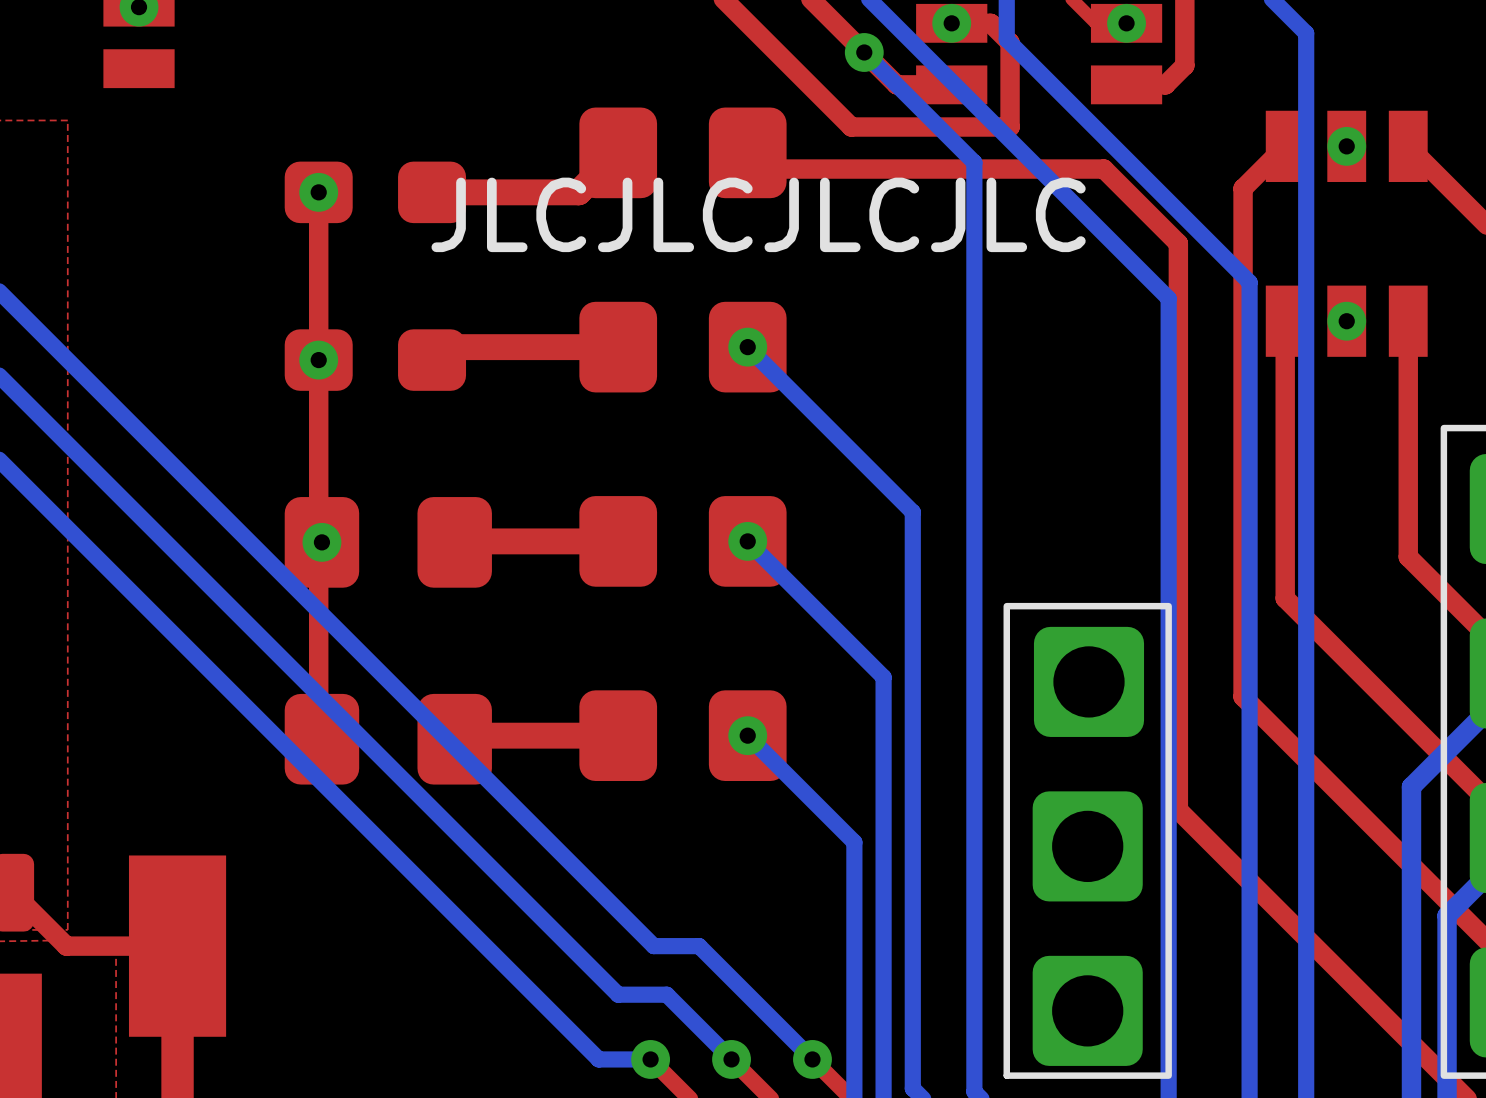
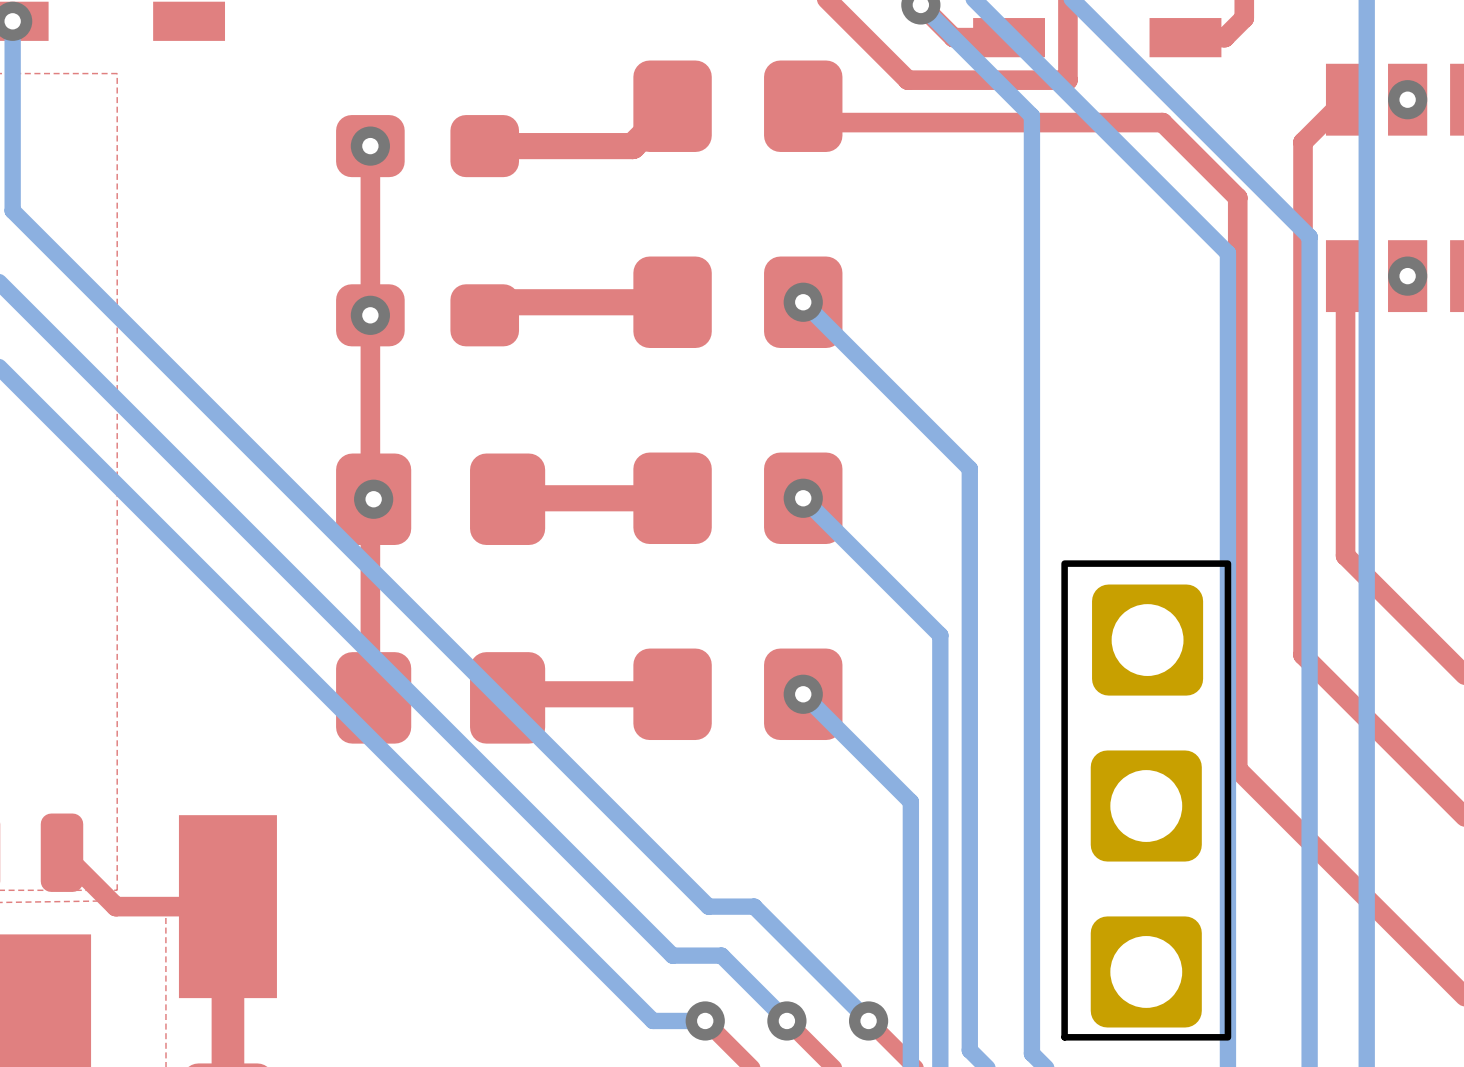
text: JLCJLCJLCJLC (758, 214) -> none

